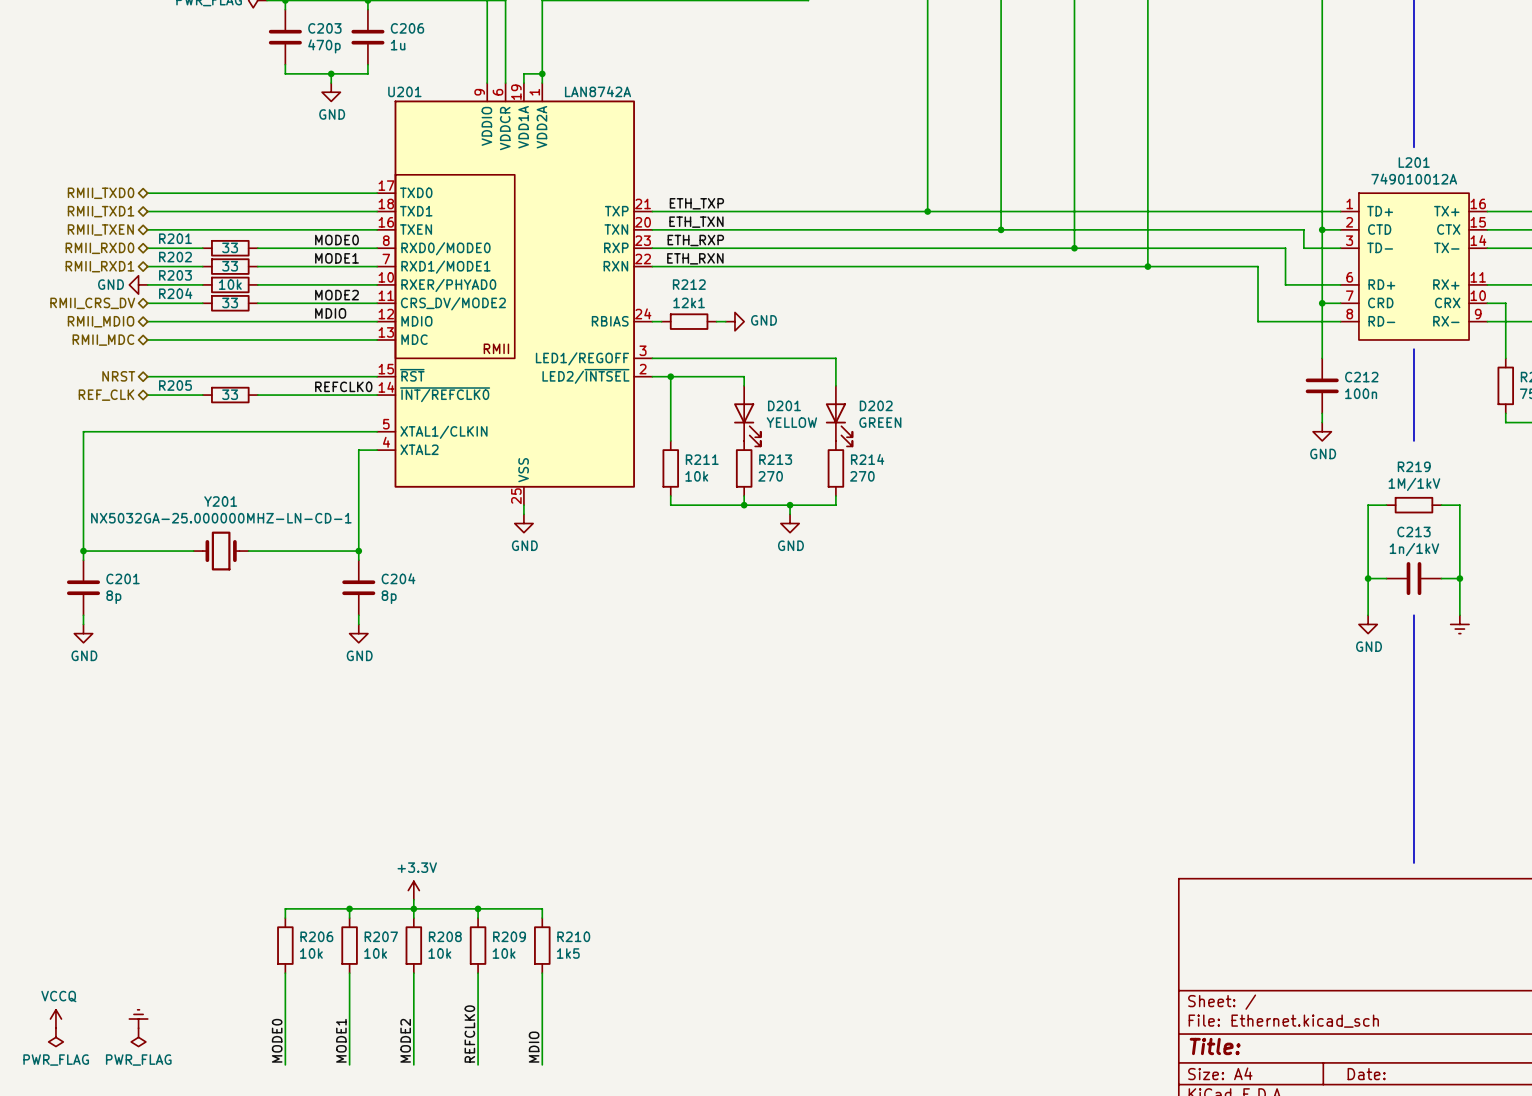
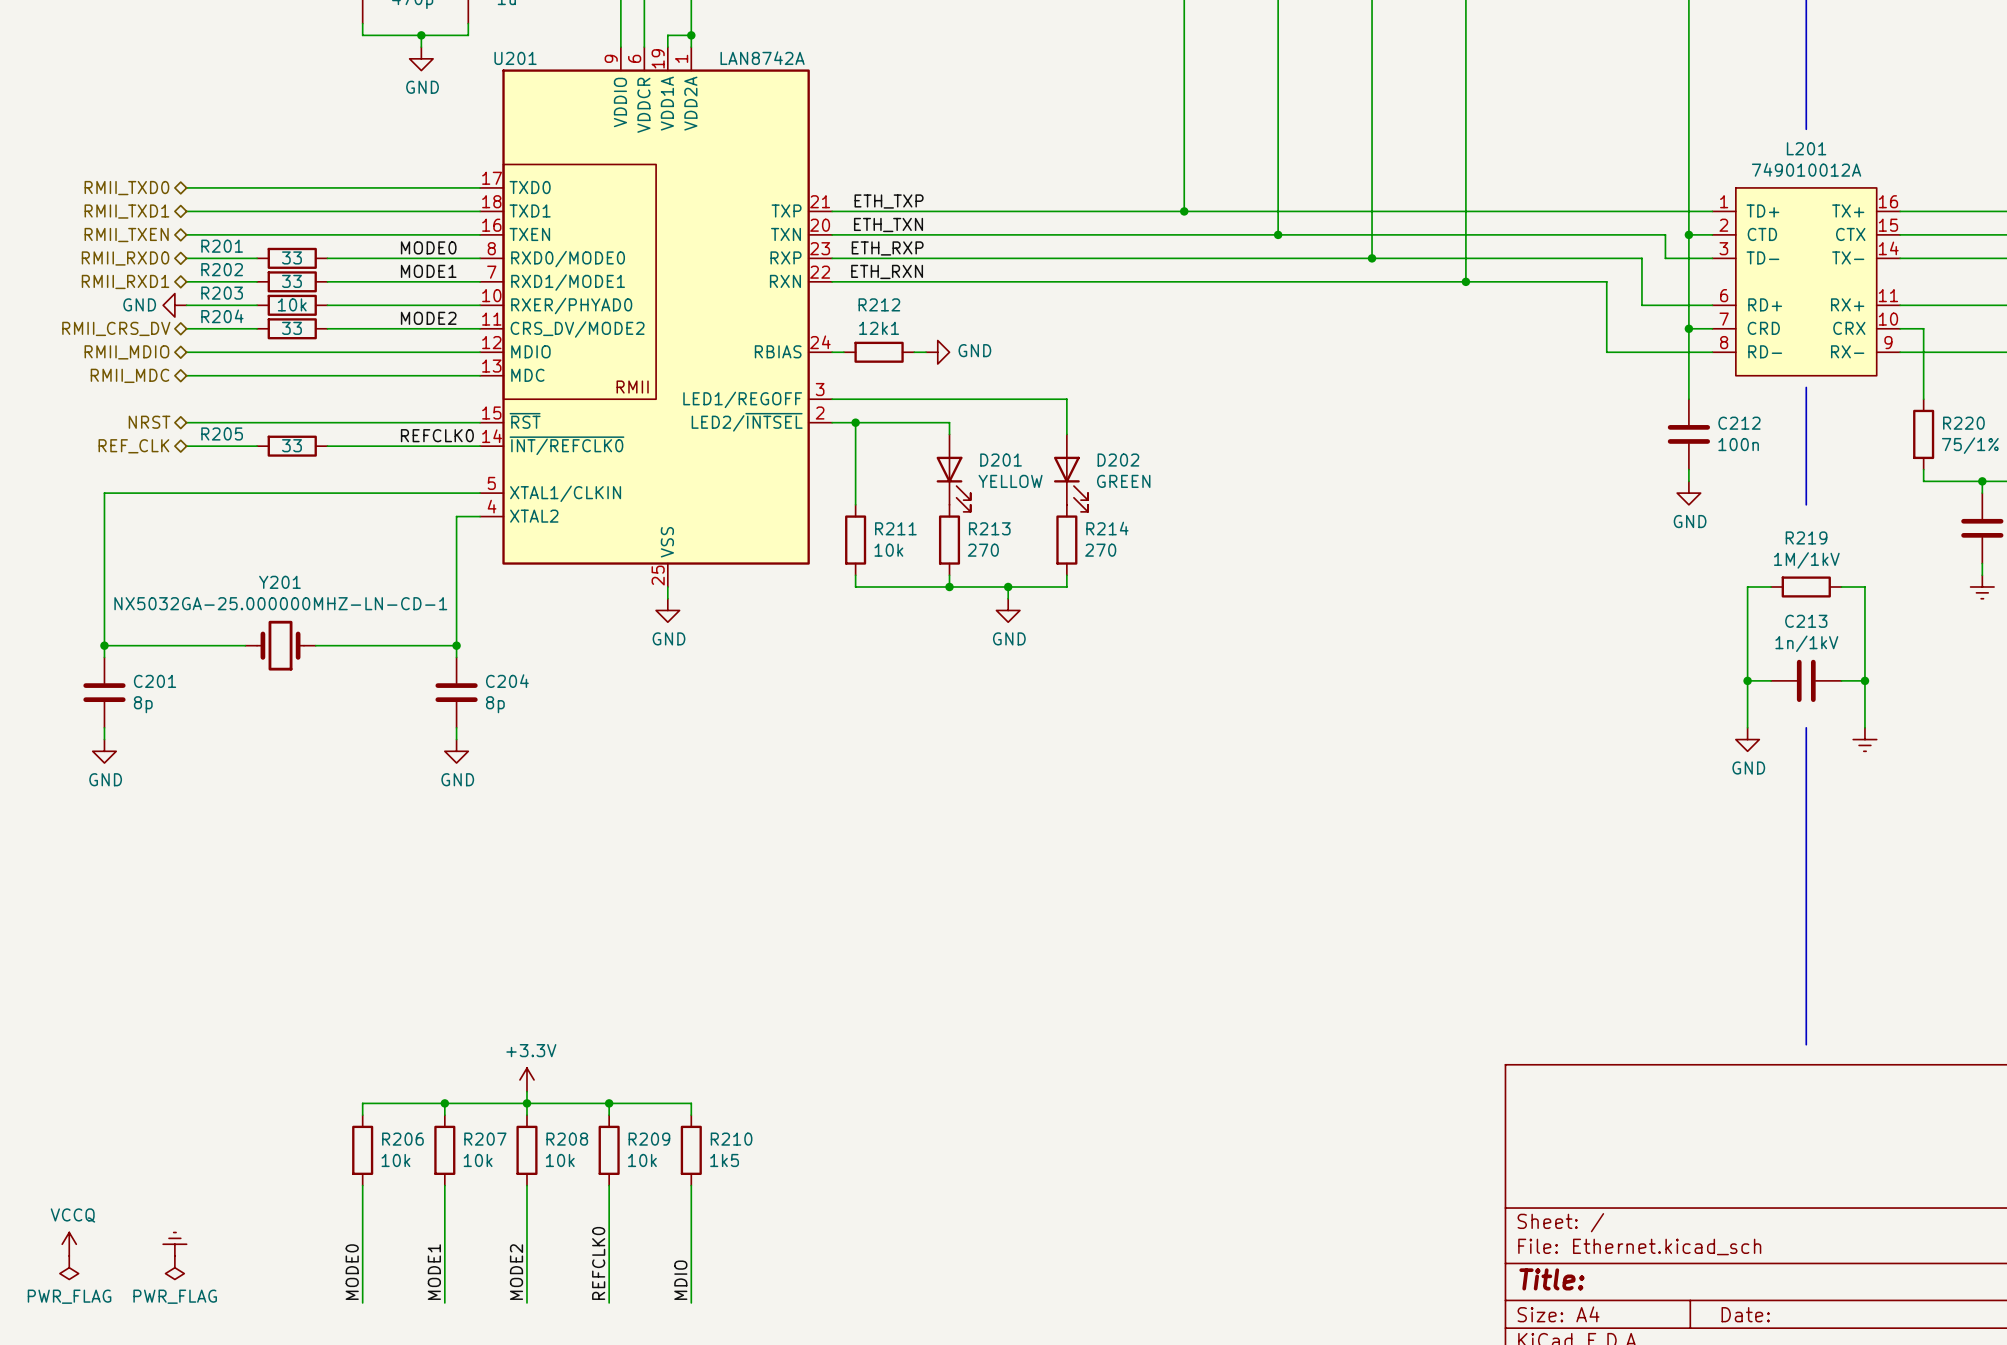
label: MDIO (330, 313) -> none

